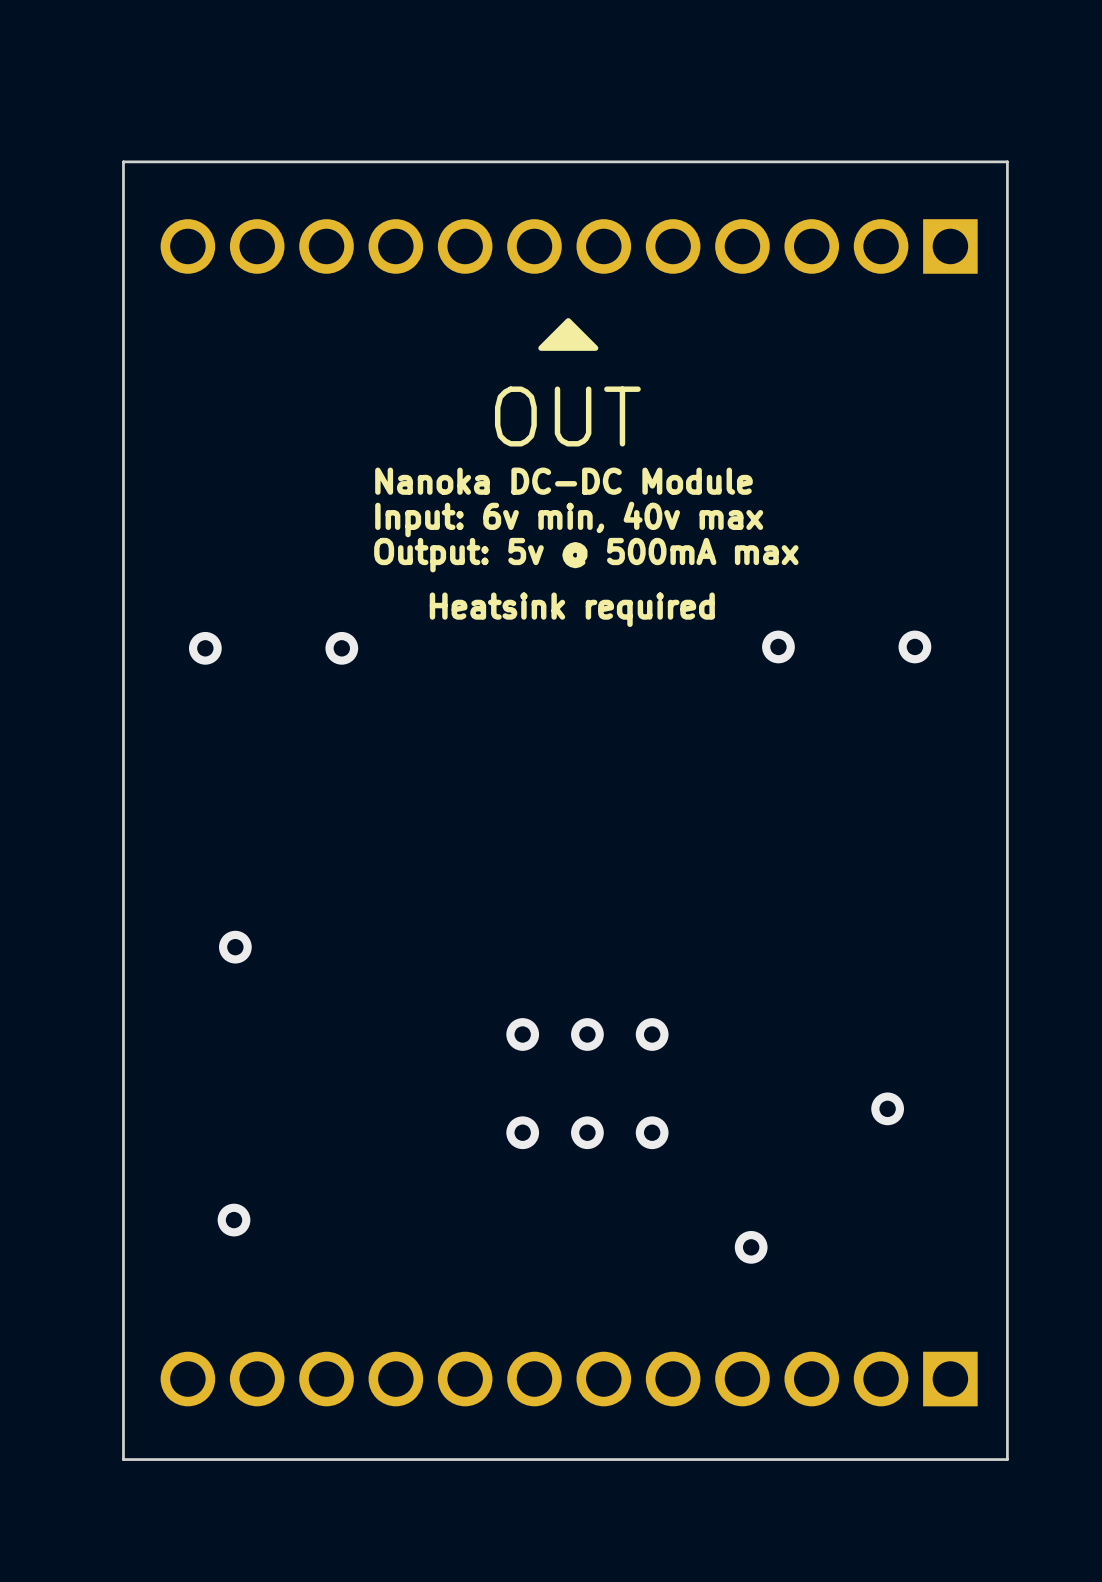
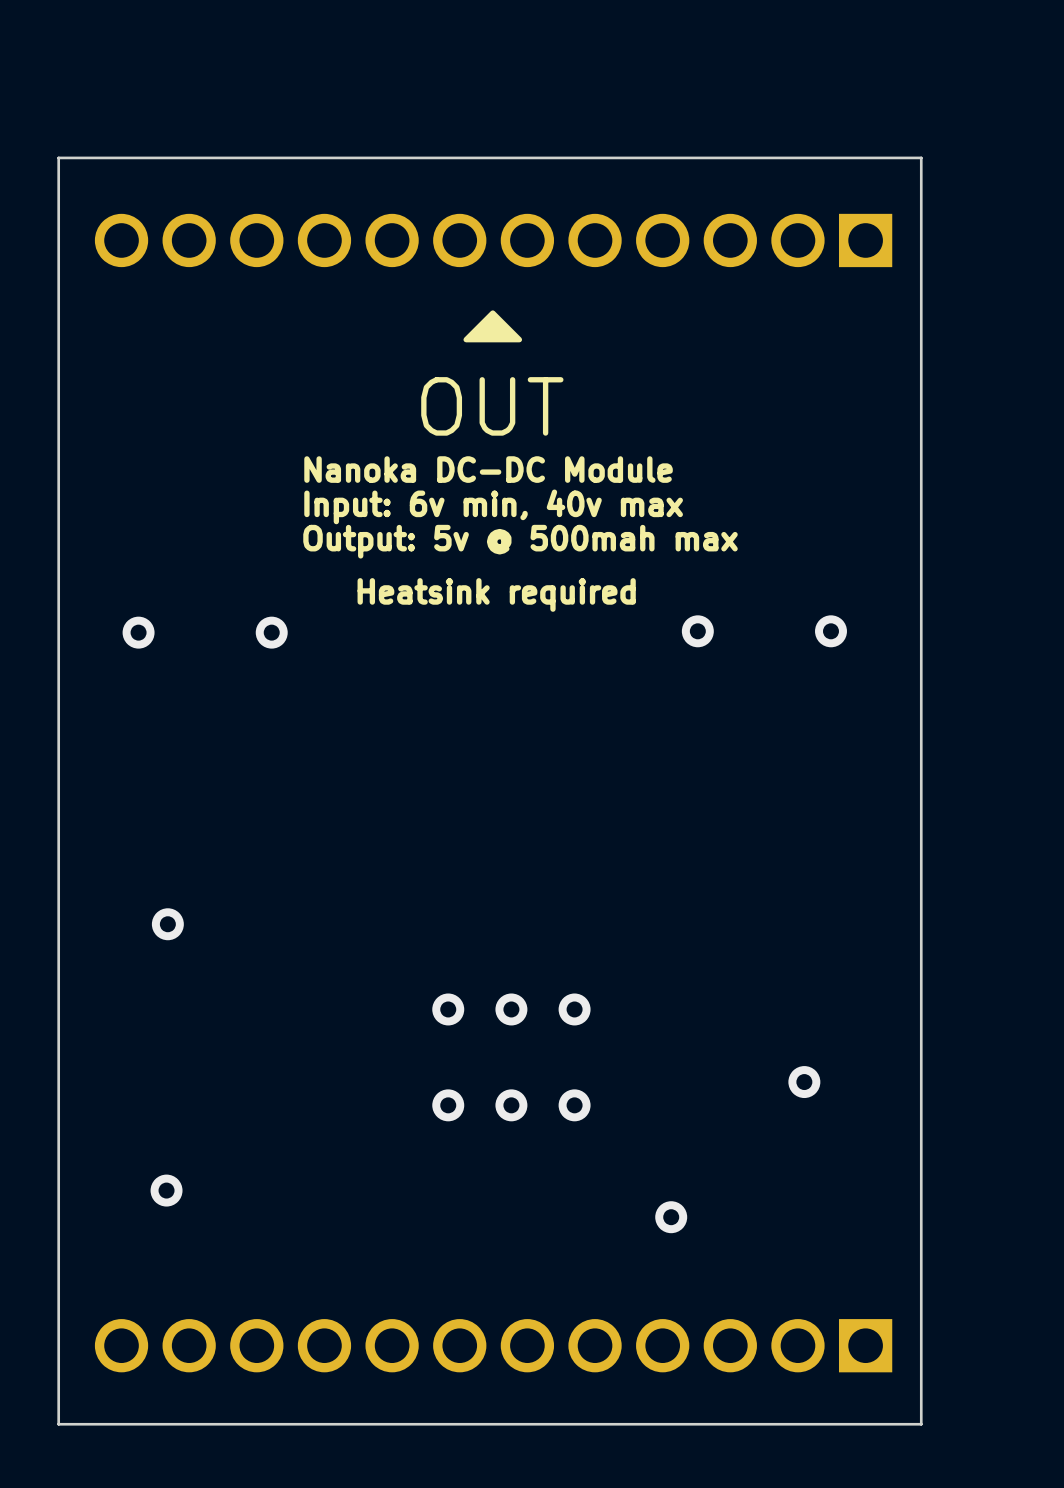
text: Output: 5v @ 500mA max (586, 555) -> Output: 5v @ 500mah max (520, 541)

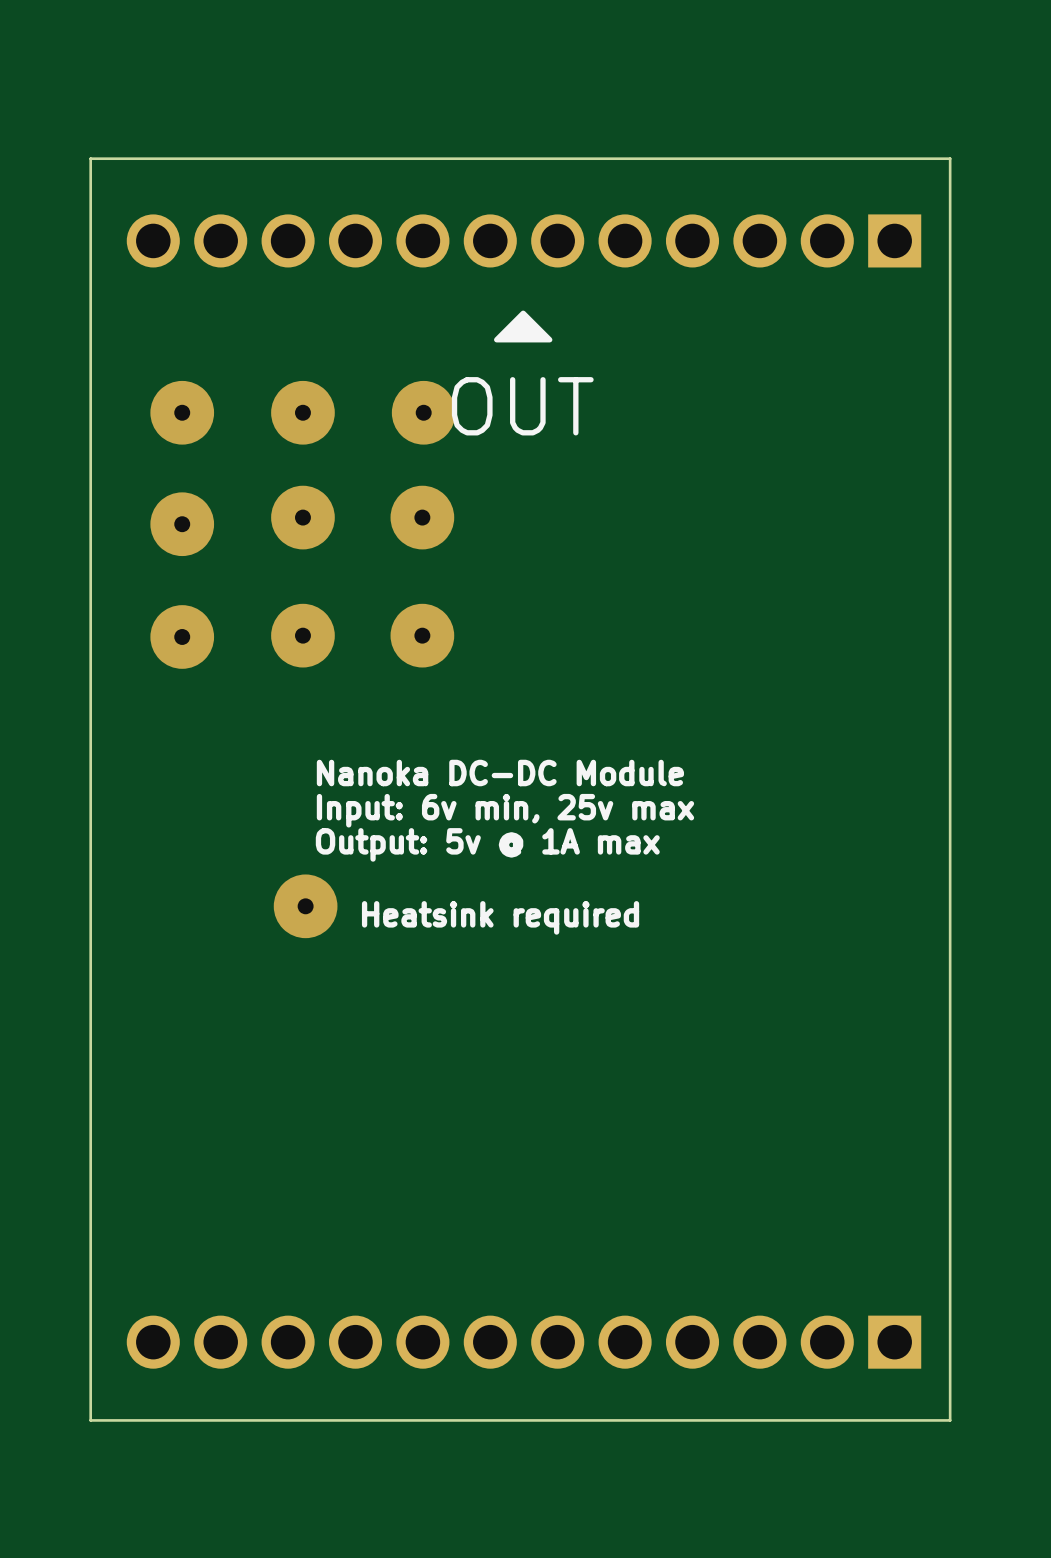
via: none -> (182, 412)
via: none -> (302, 412)
via: none -> (423, 412)
text position: Nanoka DC-DC Module (488, 469) -> Nanoka DC-DC Module (500, 773)
text: Input: 6v min, 40v max (493, 506) -> none
via: none -> (302, 517)
via: none -> (422, 517)
via: none -> (182, 524)
text: Output: 5v @ 500mah max (520, 541) -> none
text position: Heatsink required (496, 594) -> Heatsink required (500, 917)
via size: [122, 616, 155, 649] -> [150, 605, 215, 669]
via size: [255, 616, 288, 649] -> [271, 603, 335, 668]
via: (697, 631) -> none
via: (830, 631) -> none
via: none -> (422, 635)
text: none -> Input: 6v min, 25v max (505, 810)
text: none -> Output: 5v @ 1A max (487, 844)
via: none -> (305, 906)
via: (167, 924) -> none
via: (448, 1009) -> none
via: (511, 1009) -> none
via: (574, 1009) -> none
via: (804, 1082) -> none
via: (448, 1105) -> none
via: (511, 1105) -> none
via: (574, 1105) -> none
via: (166, 1190) -> none
via: (671, 1217) -> none

